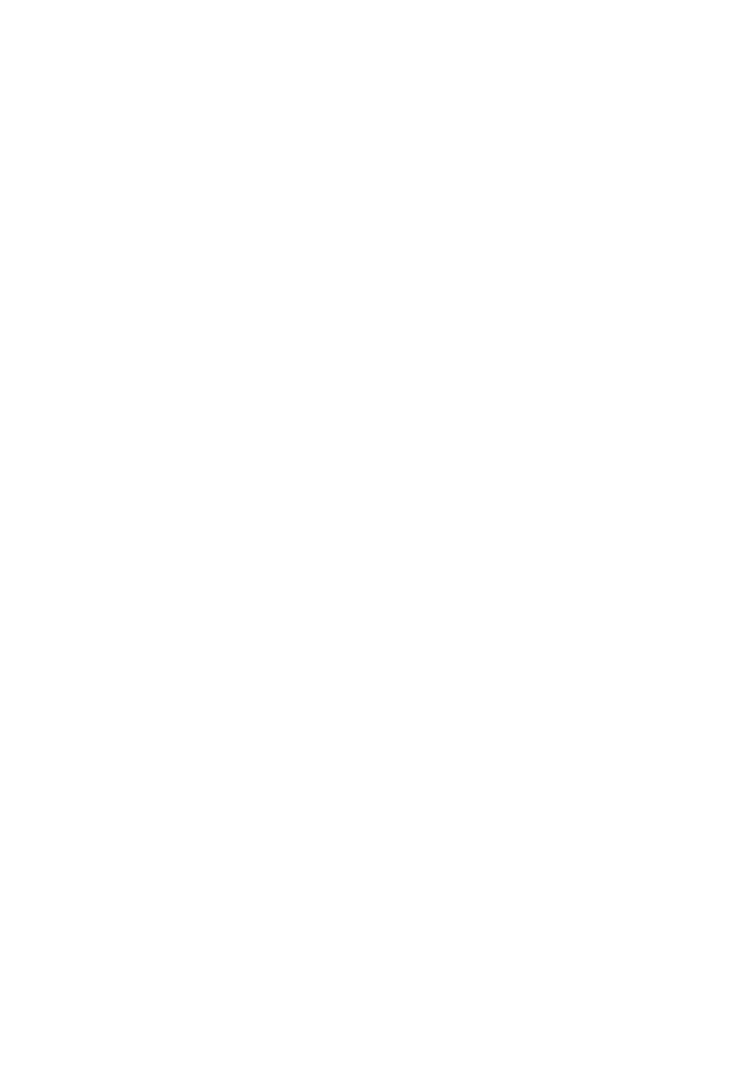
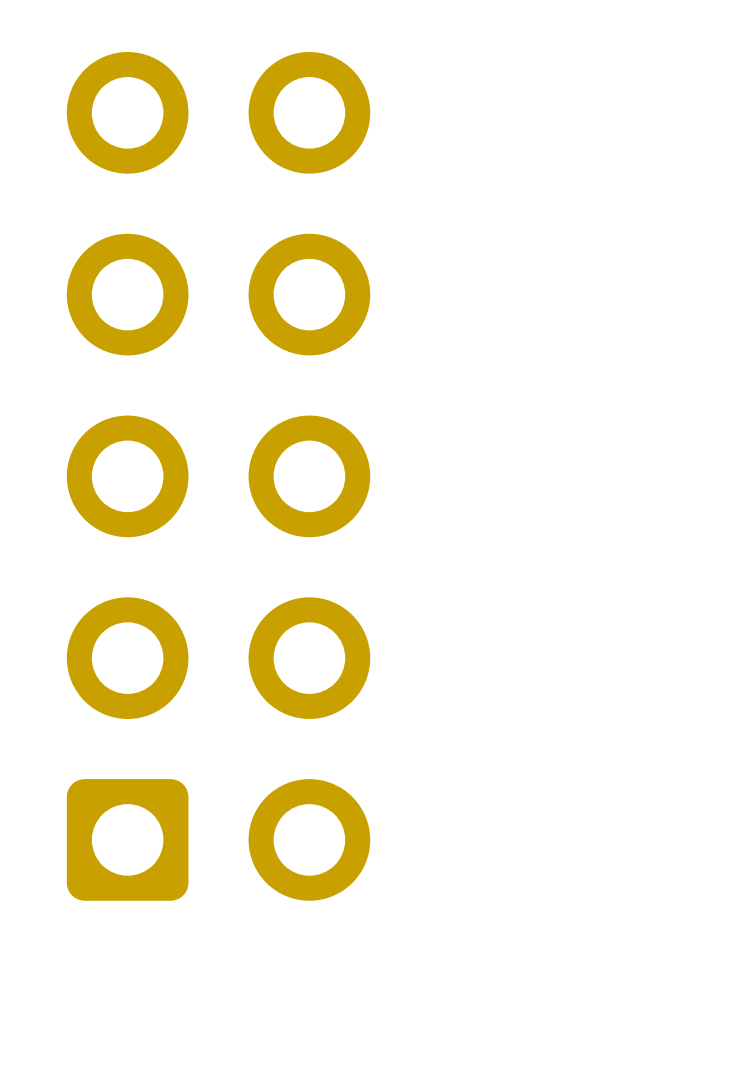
part: none -> (218, 476)

